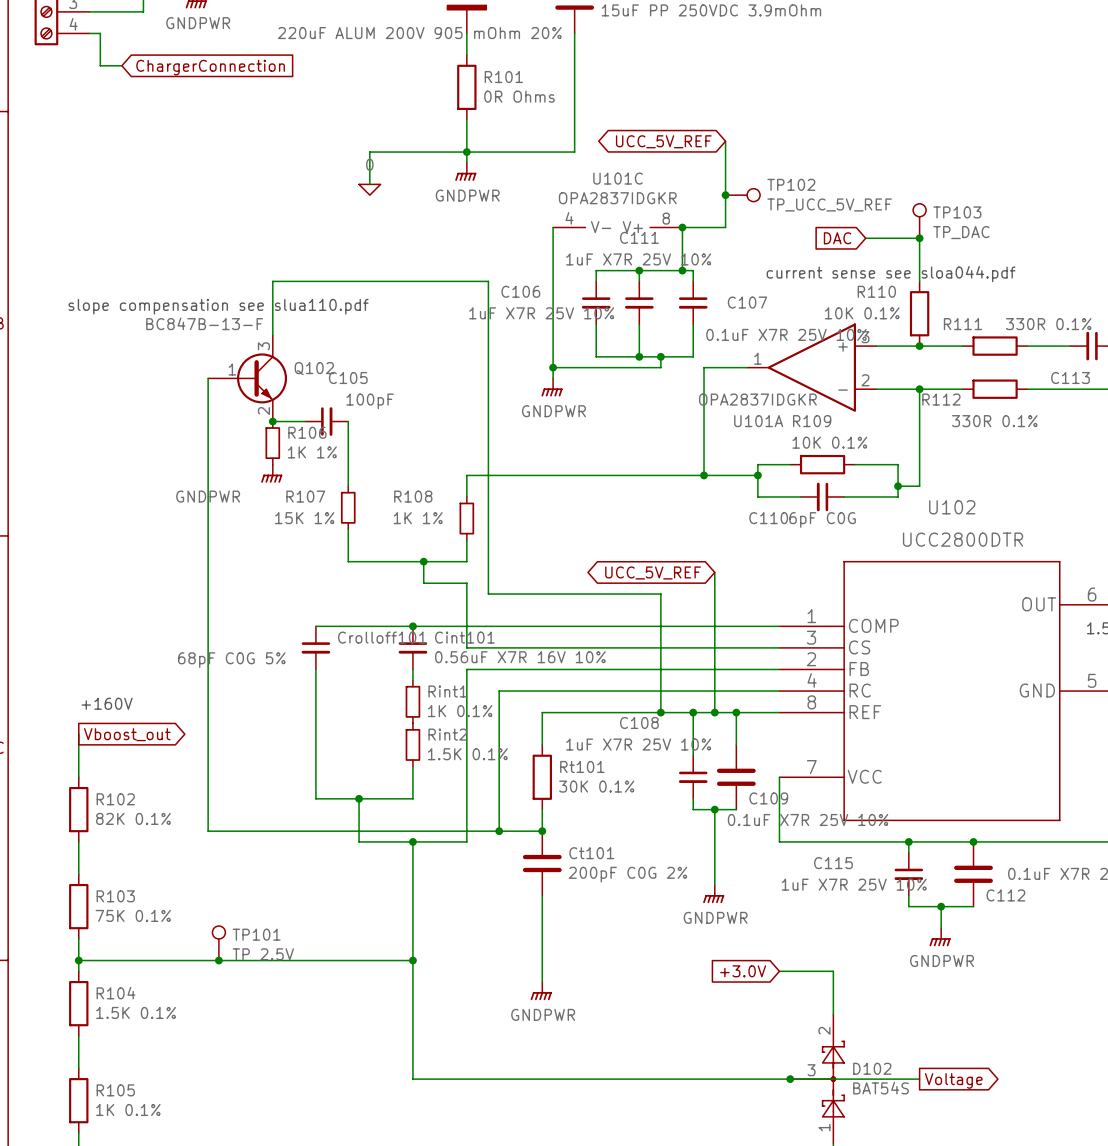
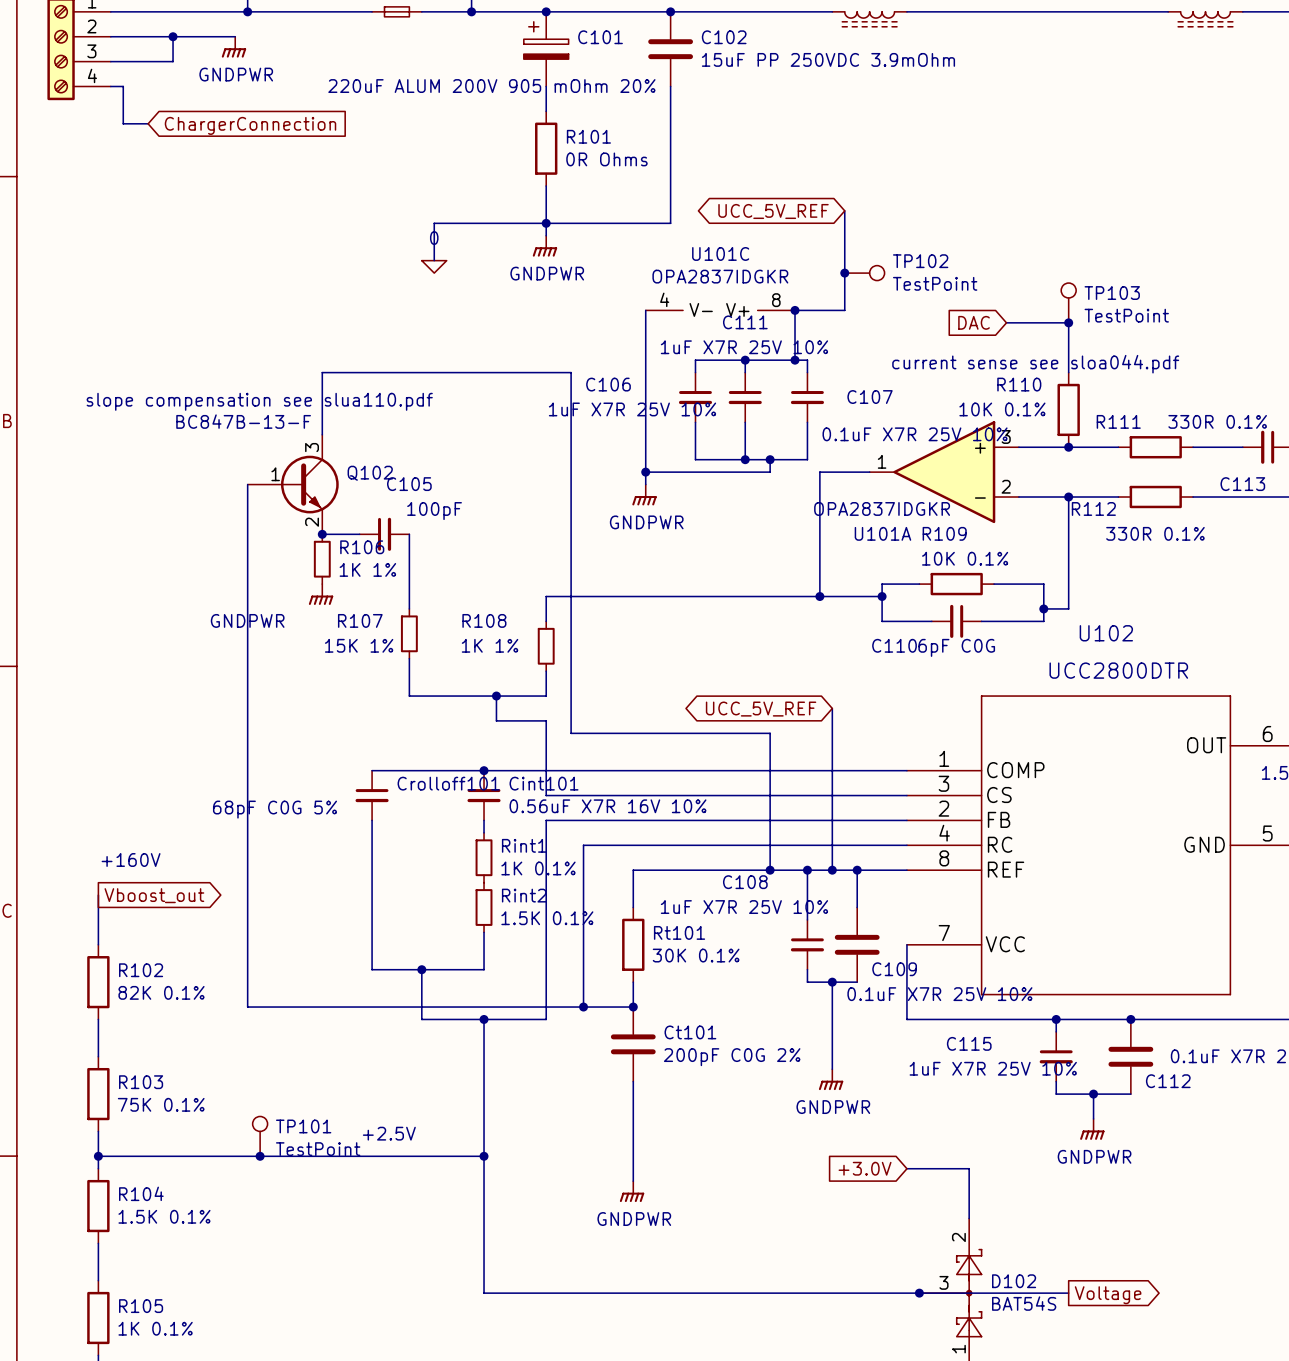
TP102 value: TP_UCC_5V_REF (829, 204) -> TestPoint (935, 283)
TP103 value: TP_DAC (961, 232) -> TestPoint (1126, 315)
text: none -> +2.5V (389, 1133)
TP101 value: TP 2.5V (263, 954) -> TestPoint (318, 1149)

